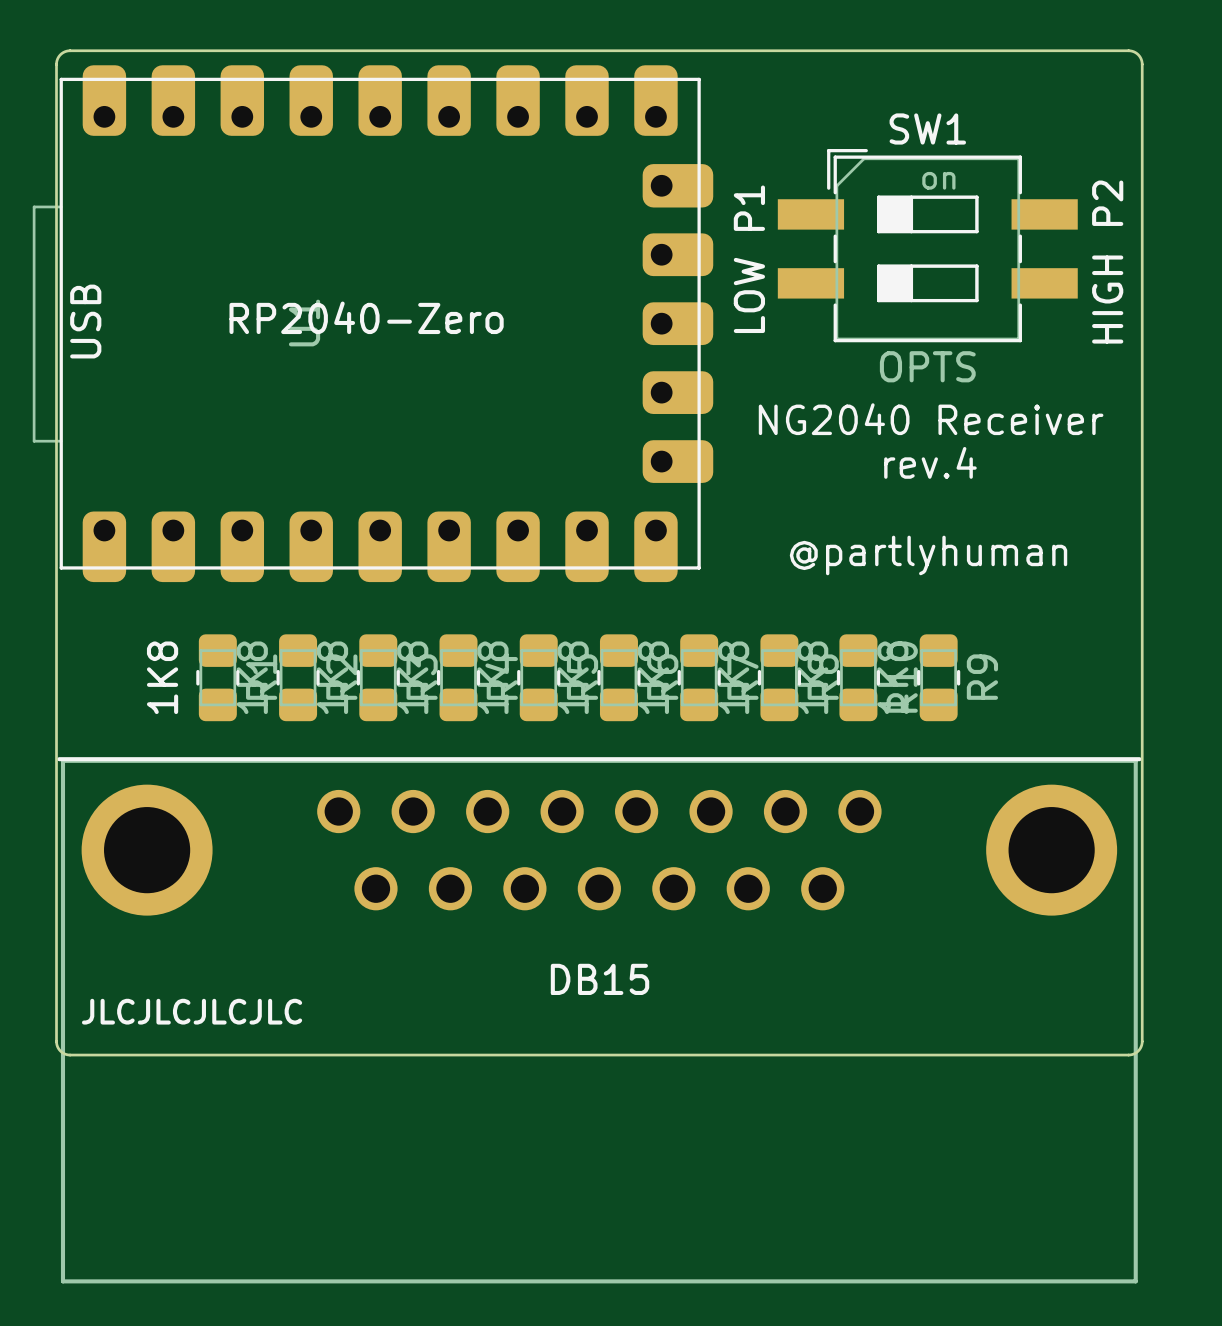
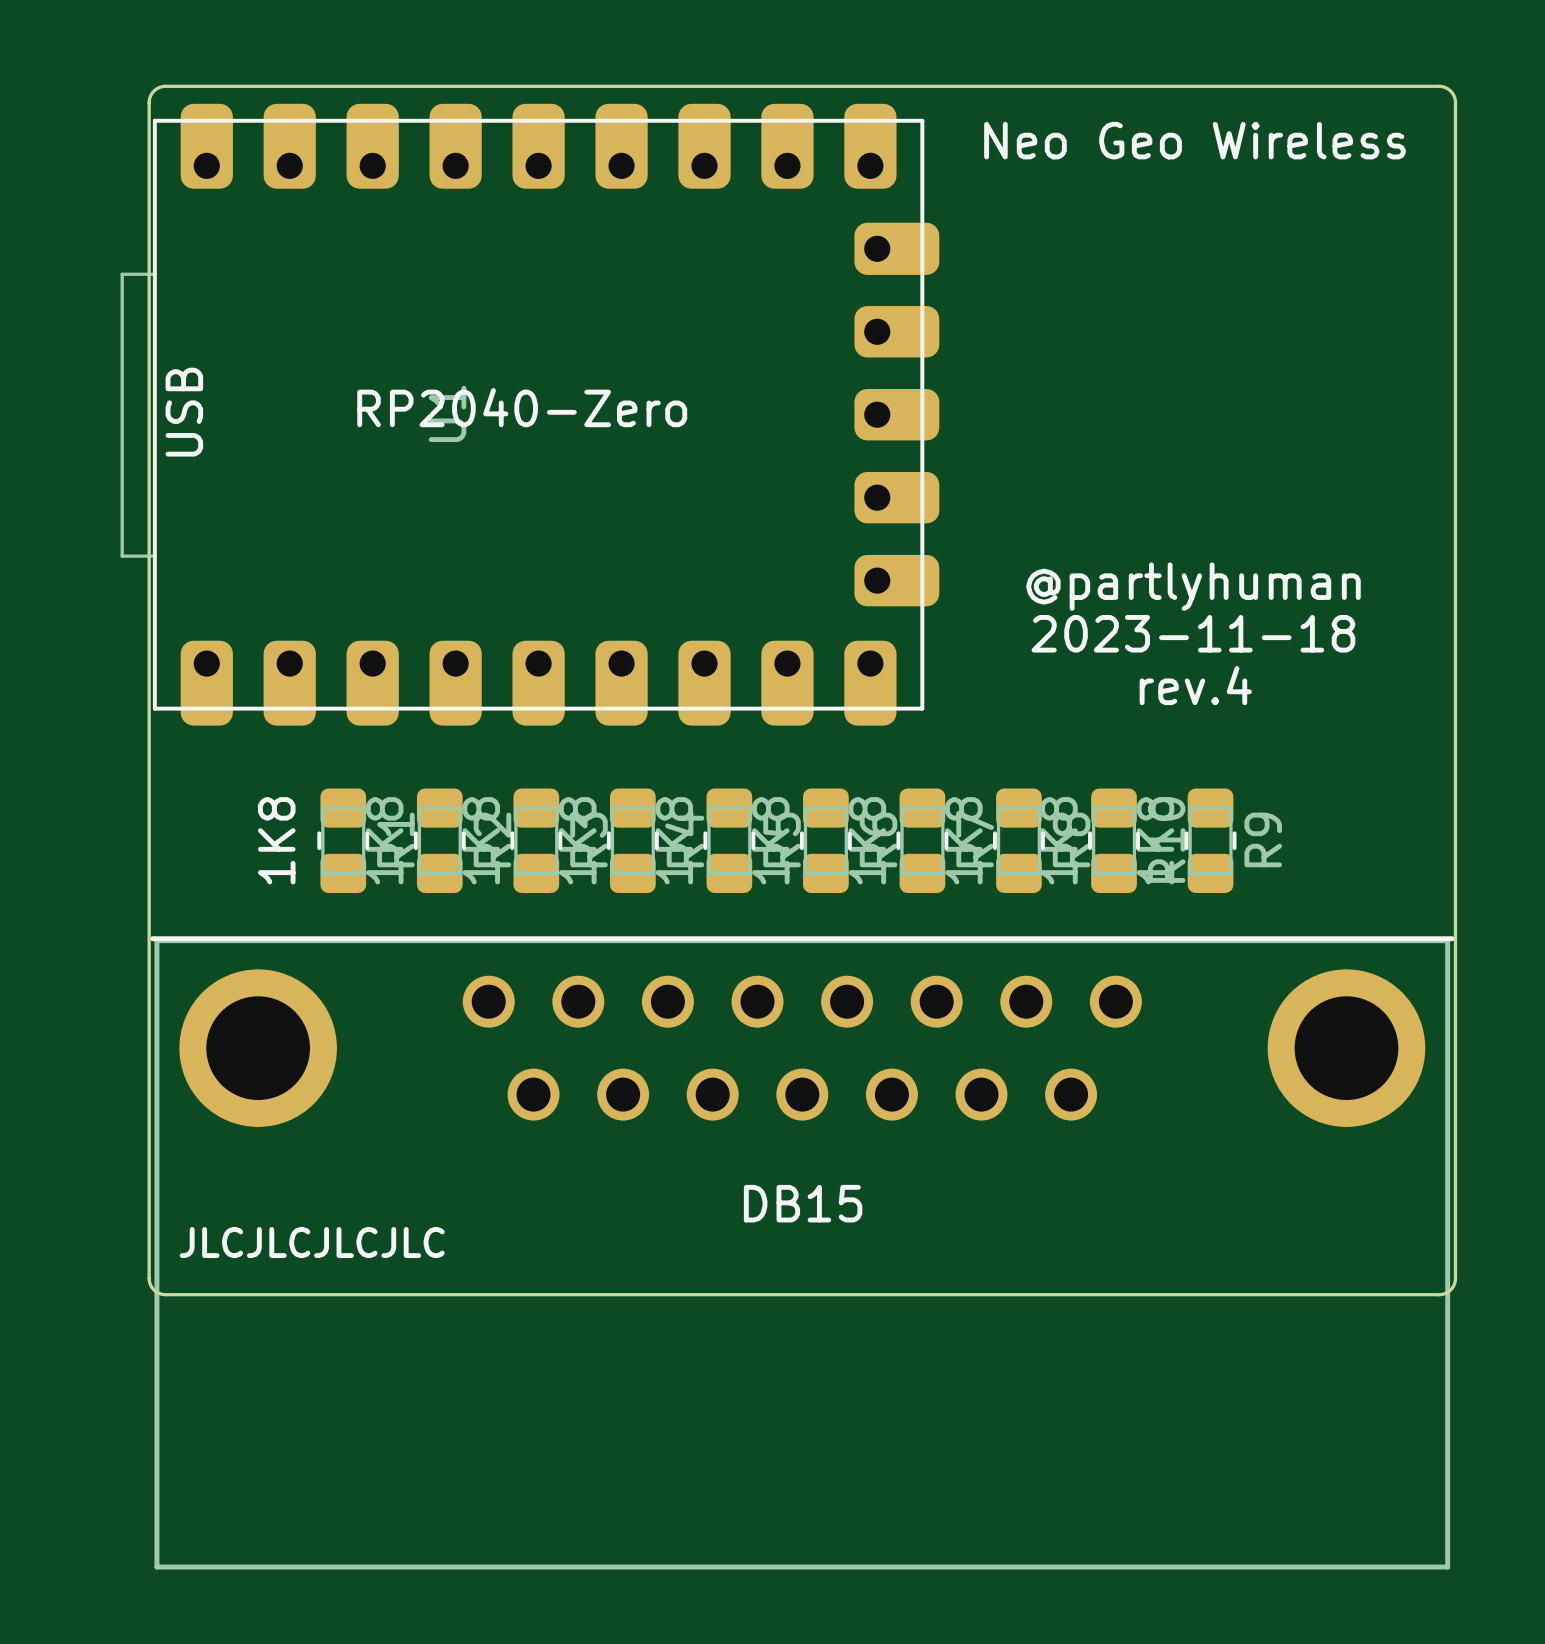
text: none -> Neo Geo Wireless (1194, 140)
SW1: OPTS (927, 245) -> none
text: LOW P1 (749, 259) -> none
text: HIGH P2 (1107, 262) -> none
text: NG2040 Receiver (931, 419) -> none
text: rev.4 (930, 462) -> @partlyhuman (1193, 586)
text: none -> 2023-11-18 (1193, 633)
text: none -> rev.4 (1195, 685)
text: @partlyhuman (928, 555) -> none

